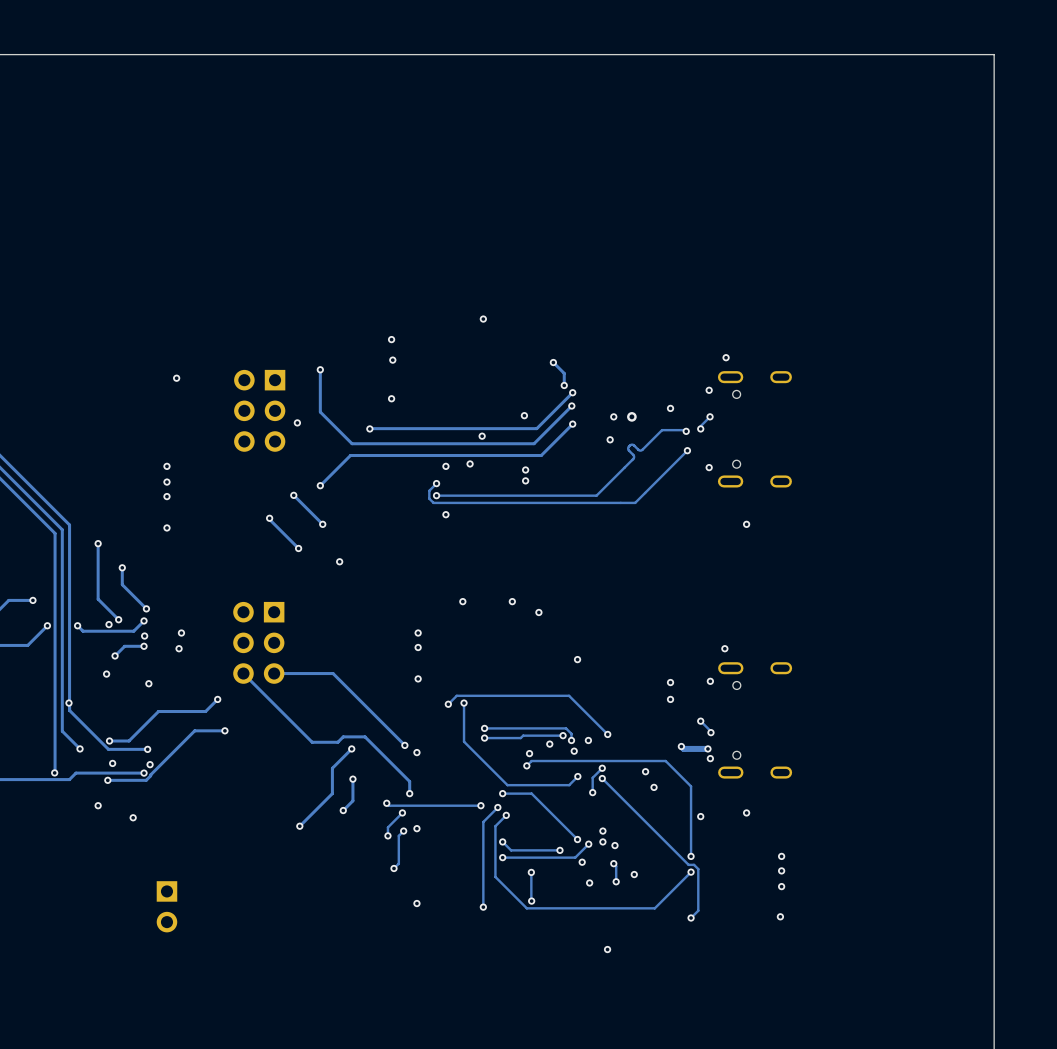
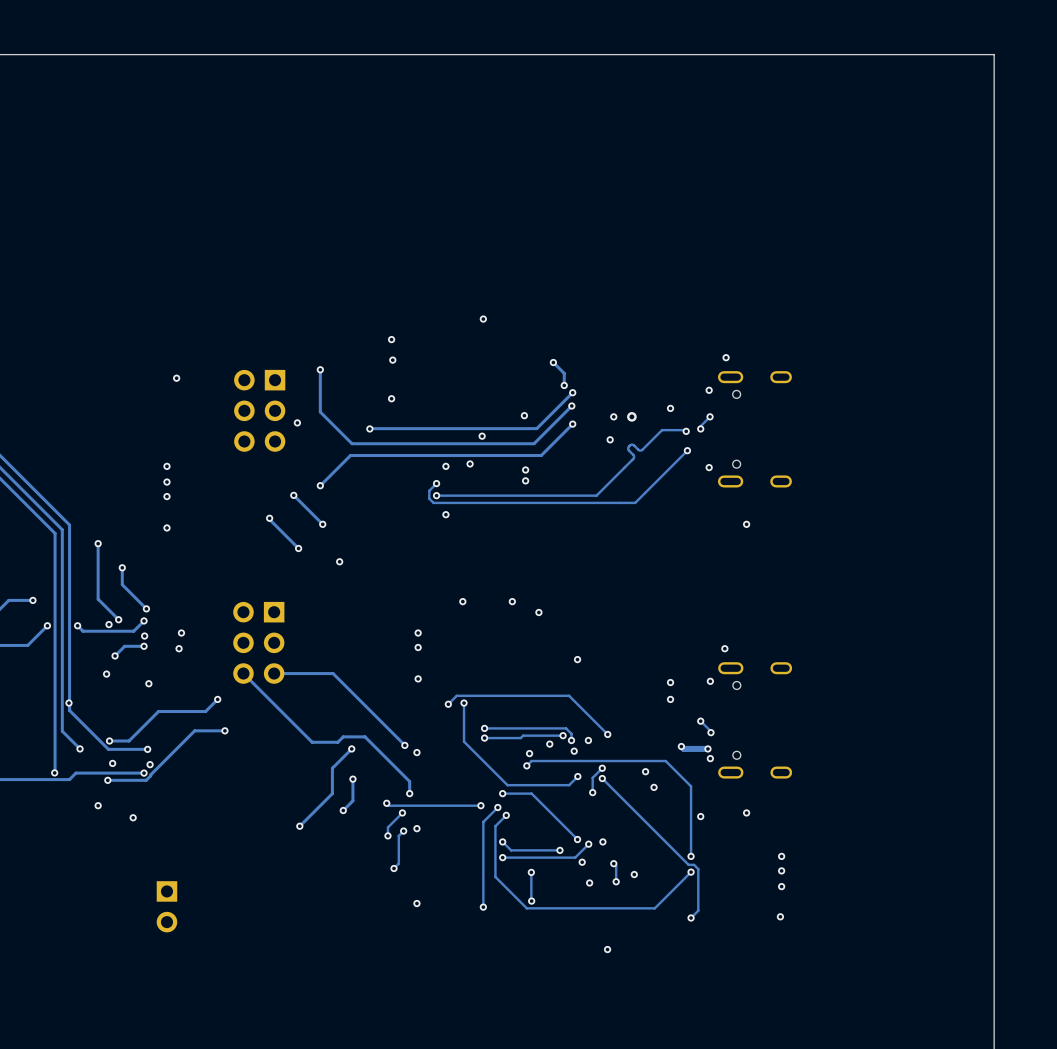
via: (602, 831) -> none
via: (614, 845) -> none

